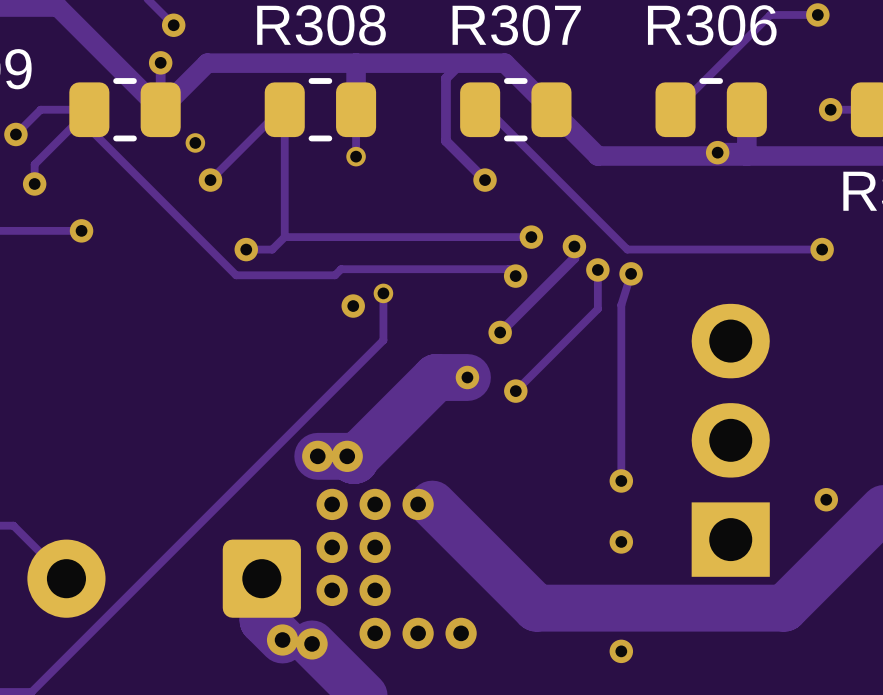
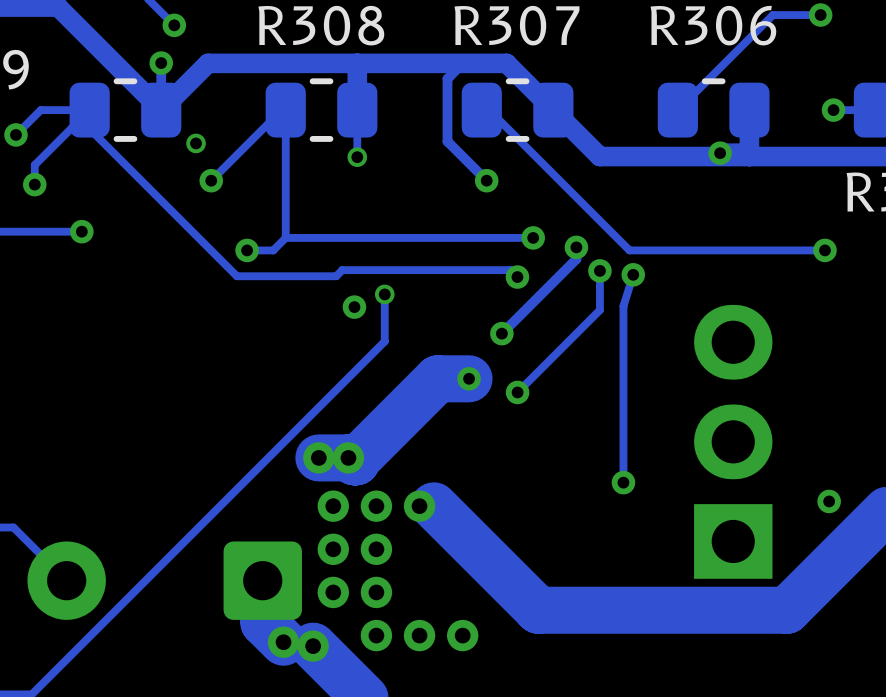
via: (621, 541) -> none
via: (621, 651) -> none

